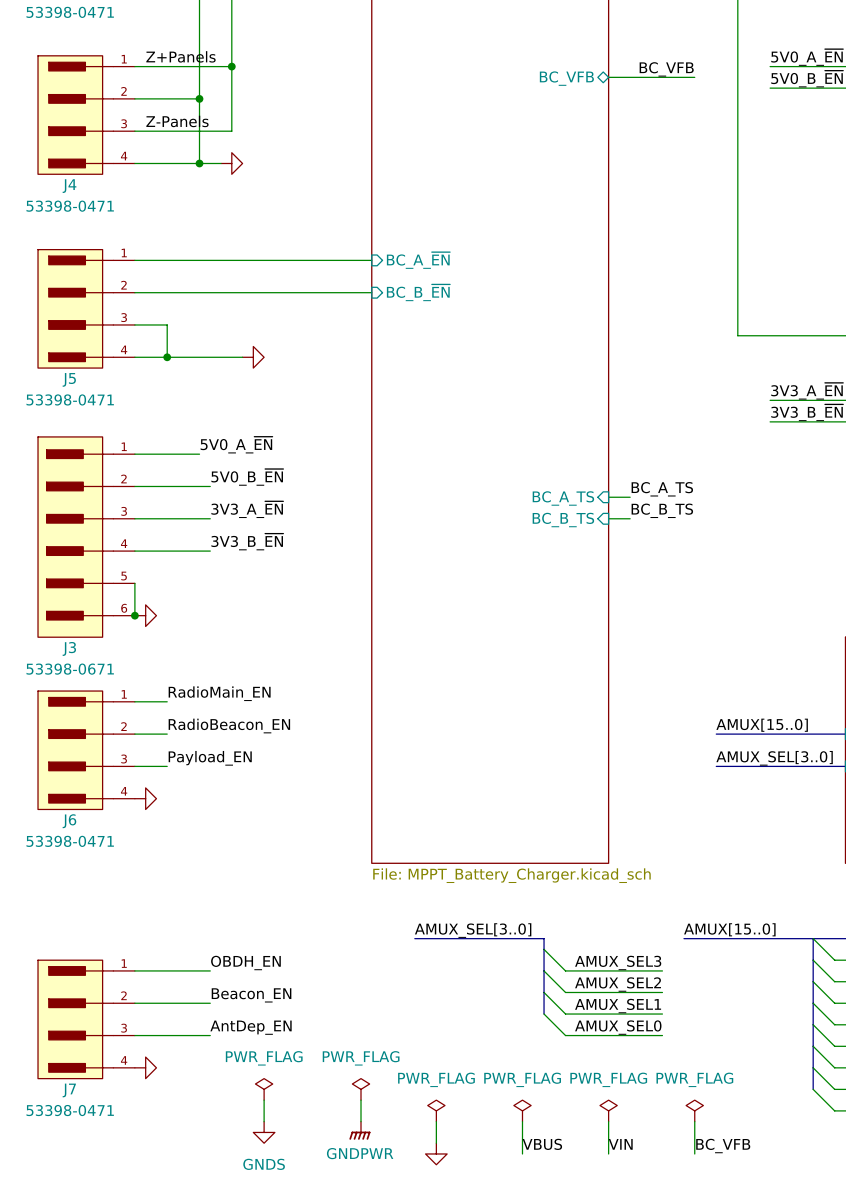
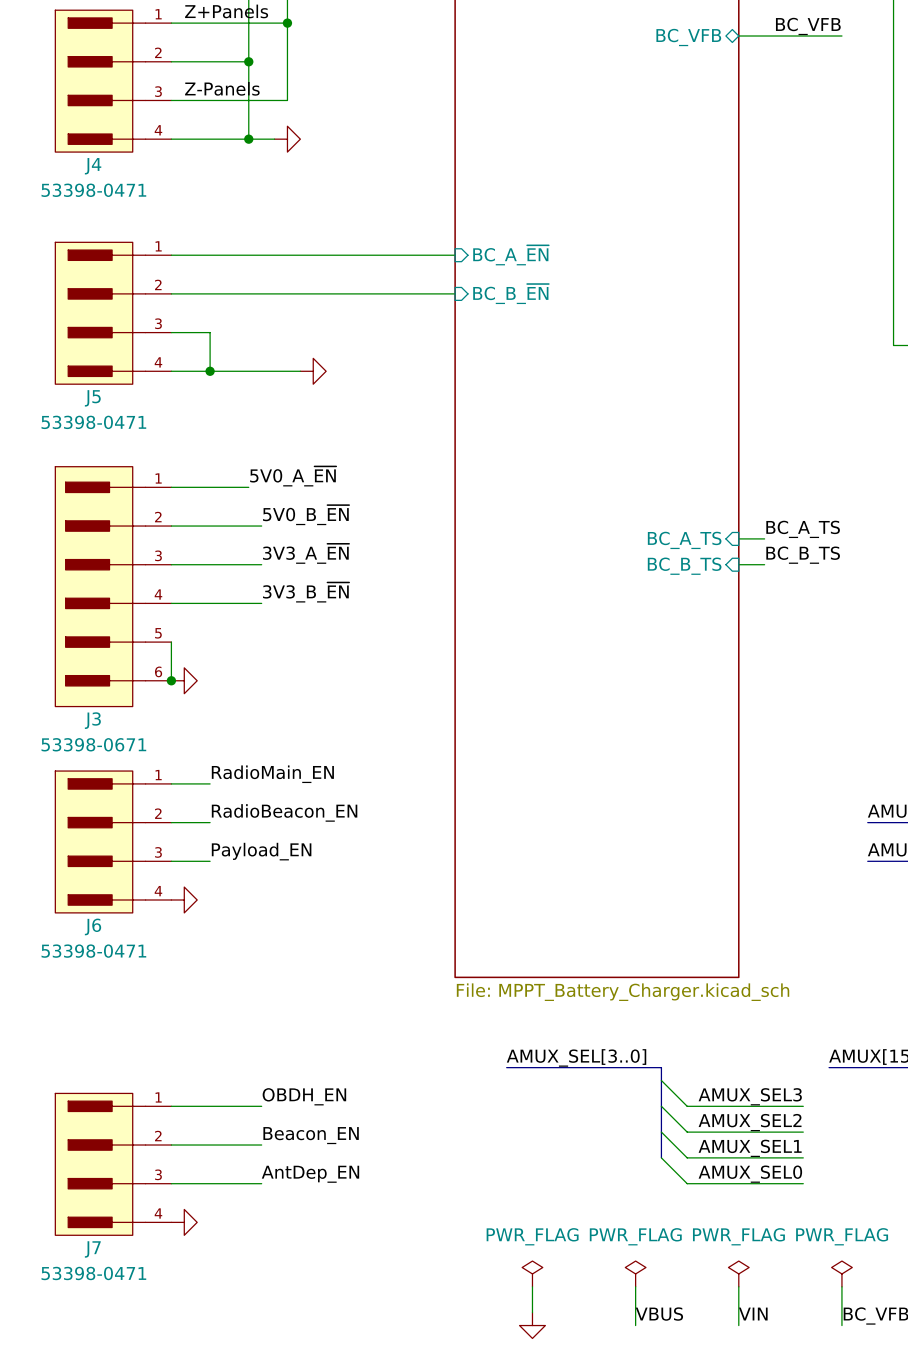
power symbol: PWR_FLAG (264, 1089) -> none
power symbol: PWR_FLAG (361, 1089) -> none
wire: (264, 1100) (264, 1121) -> none
wire: (361, 1100) (361, 1121) -> none
power symbol: GNDPWR (359, 1130) -> none
power symbol: GNDS (264, 1132) -> none

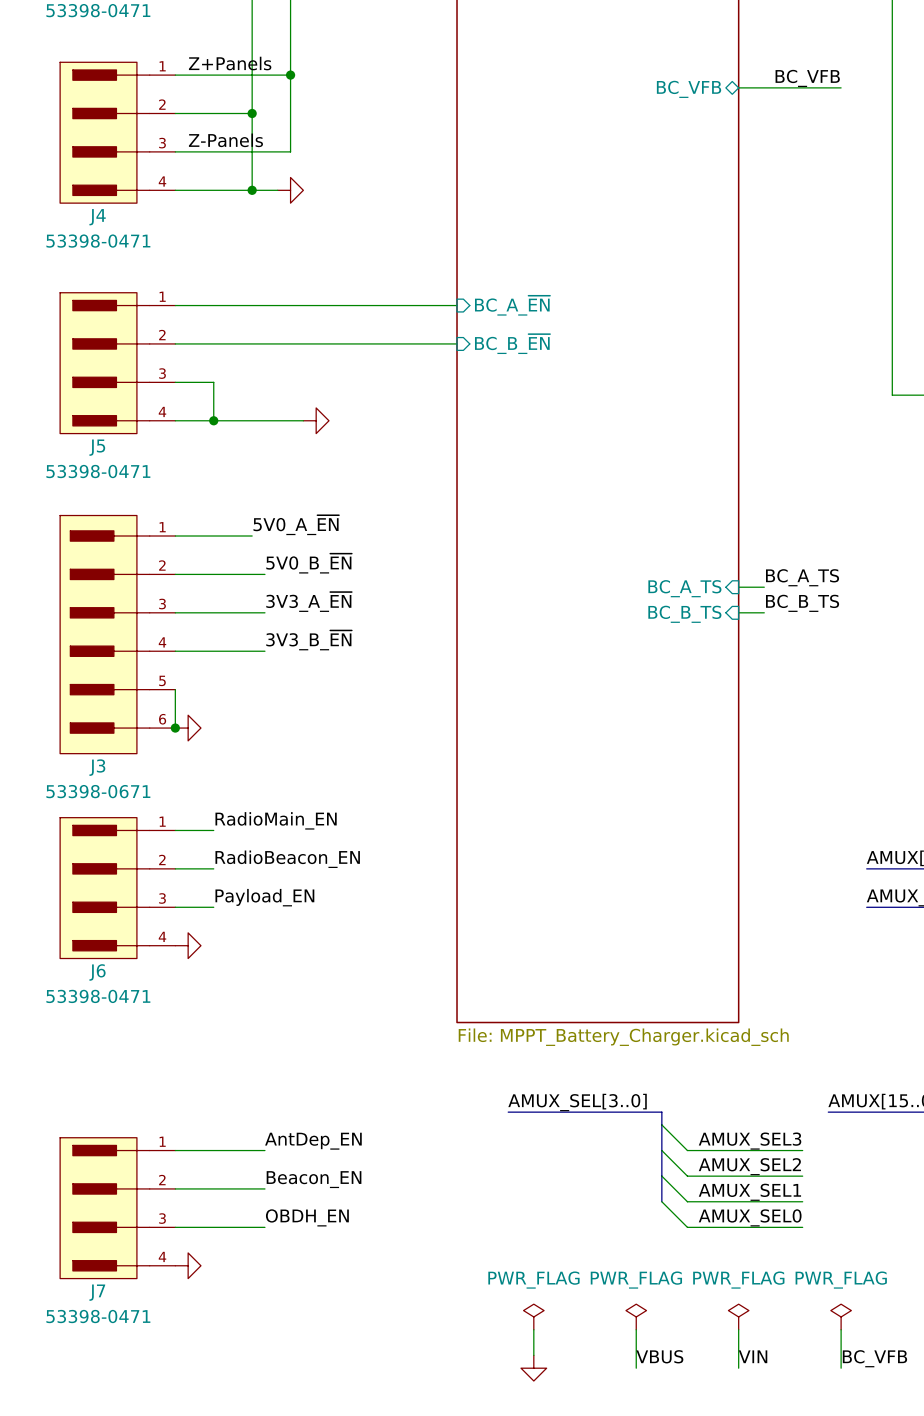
label: OBDH_EN (304, 1096) -> AntDep_EN (313, 1141)
label: AntDep_EN (310, 1174) -> OBDH_EN (307, 1217)

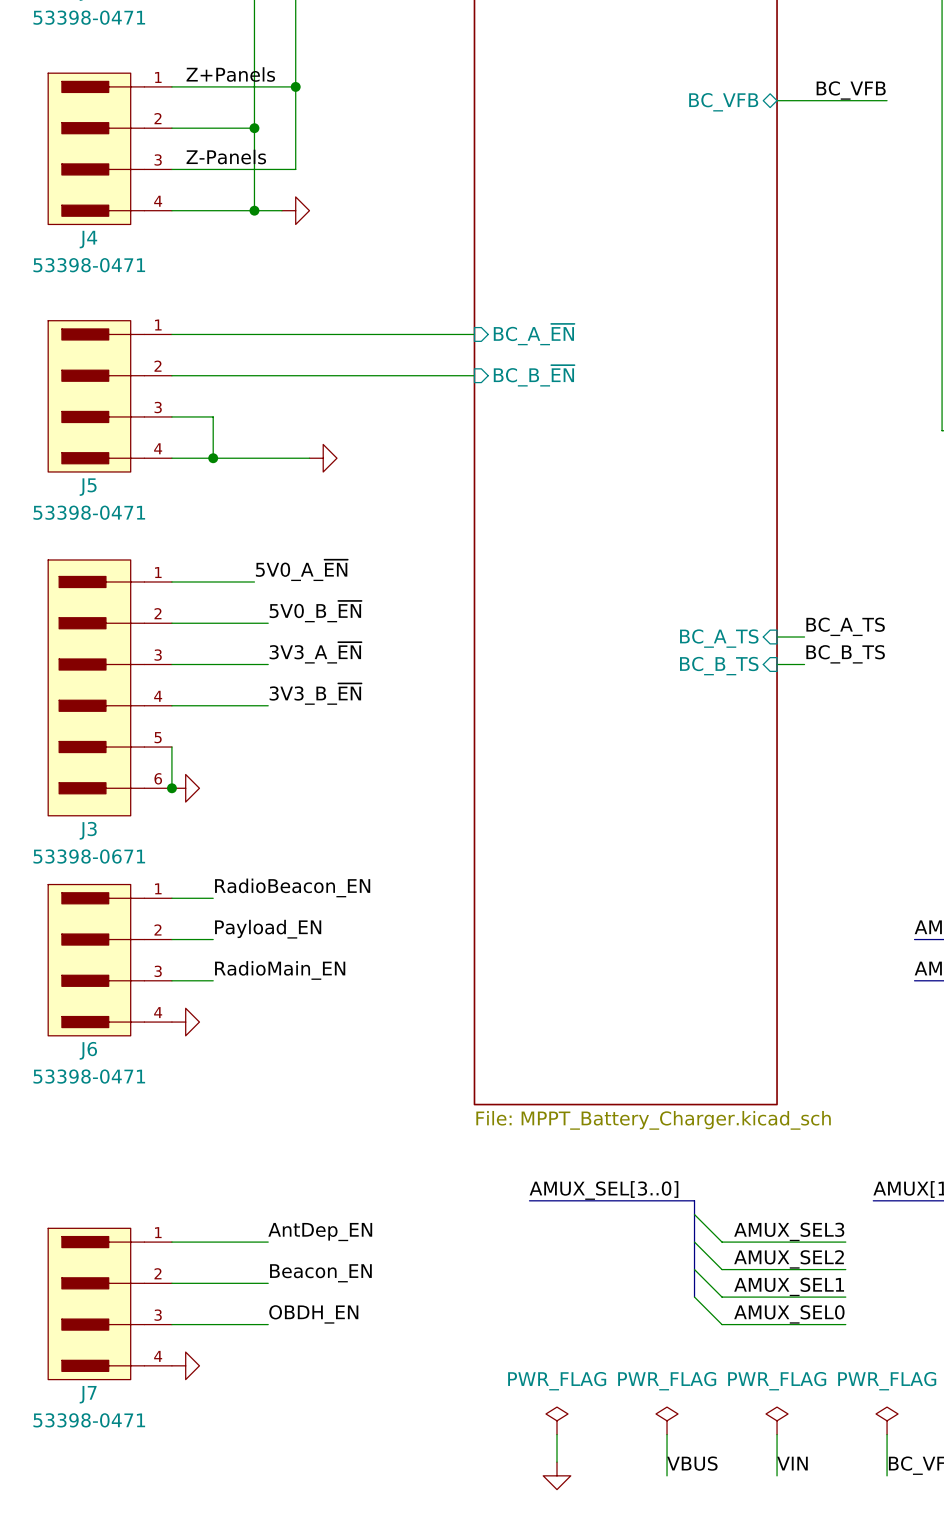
label: RadioMain_EN (276, 820) -> RadioBeacon_EN (292, 887)
label: RadioBeacon_EN (287, 859) -> Payload_EN (268, 929)
label: Payload_EN (264, 897) -> RadioMain_EN (280, 970)

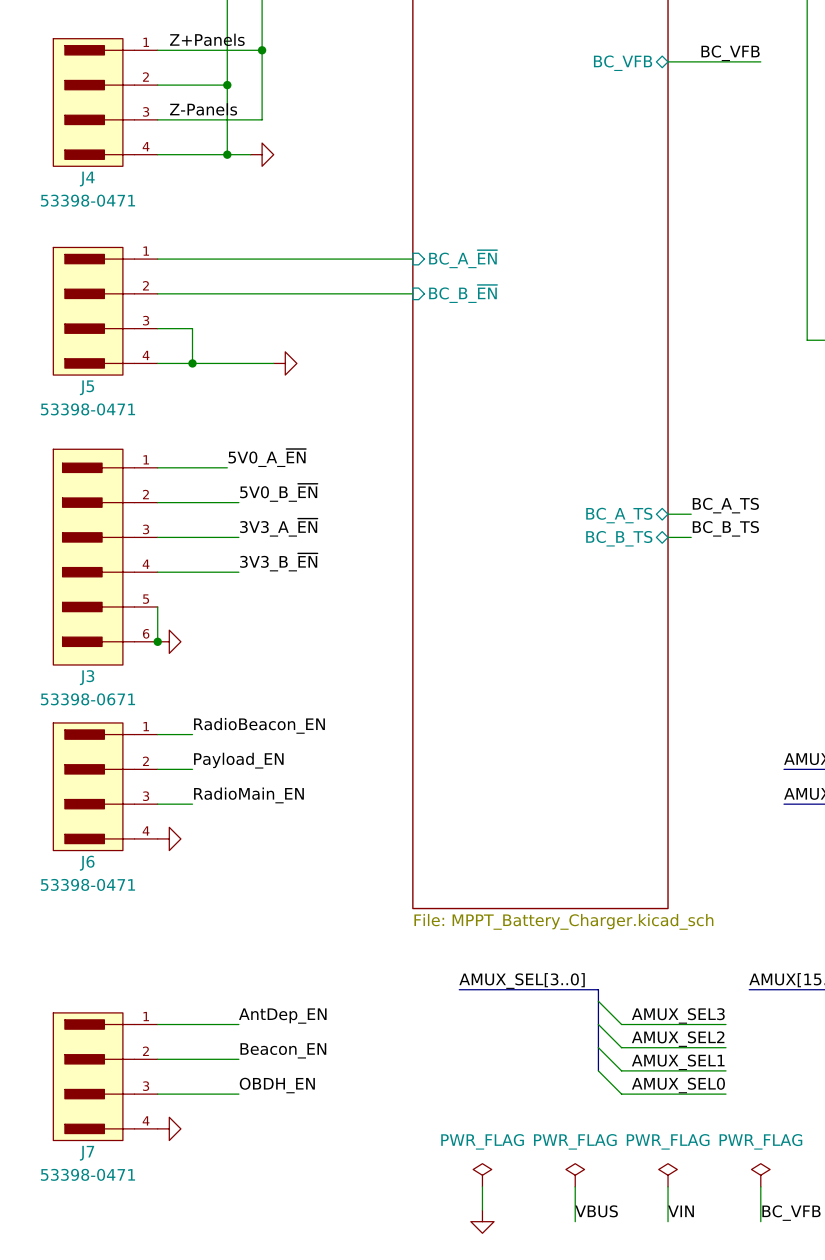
sheet pin shape: input (719, 638) -> bidirectional (619, 515)
sheet pin shape: input (719, 666) -> bidirectional (619, 538)

